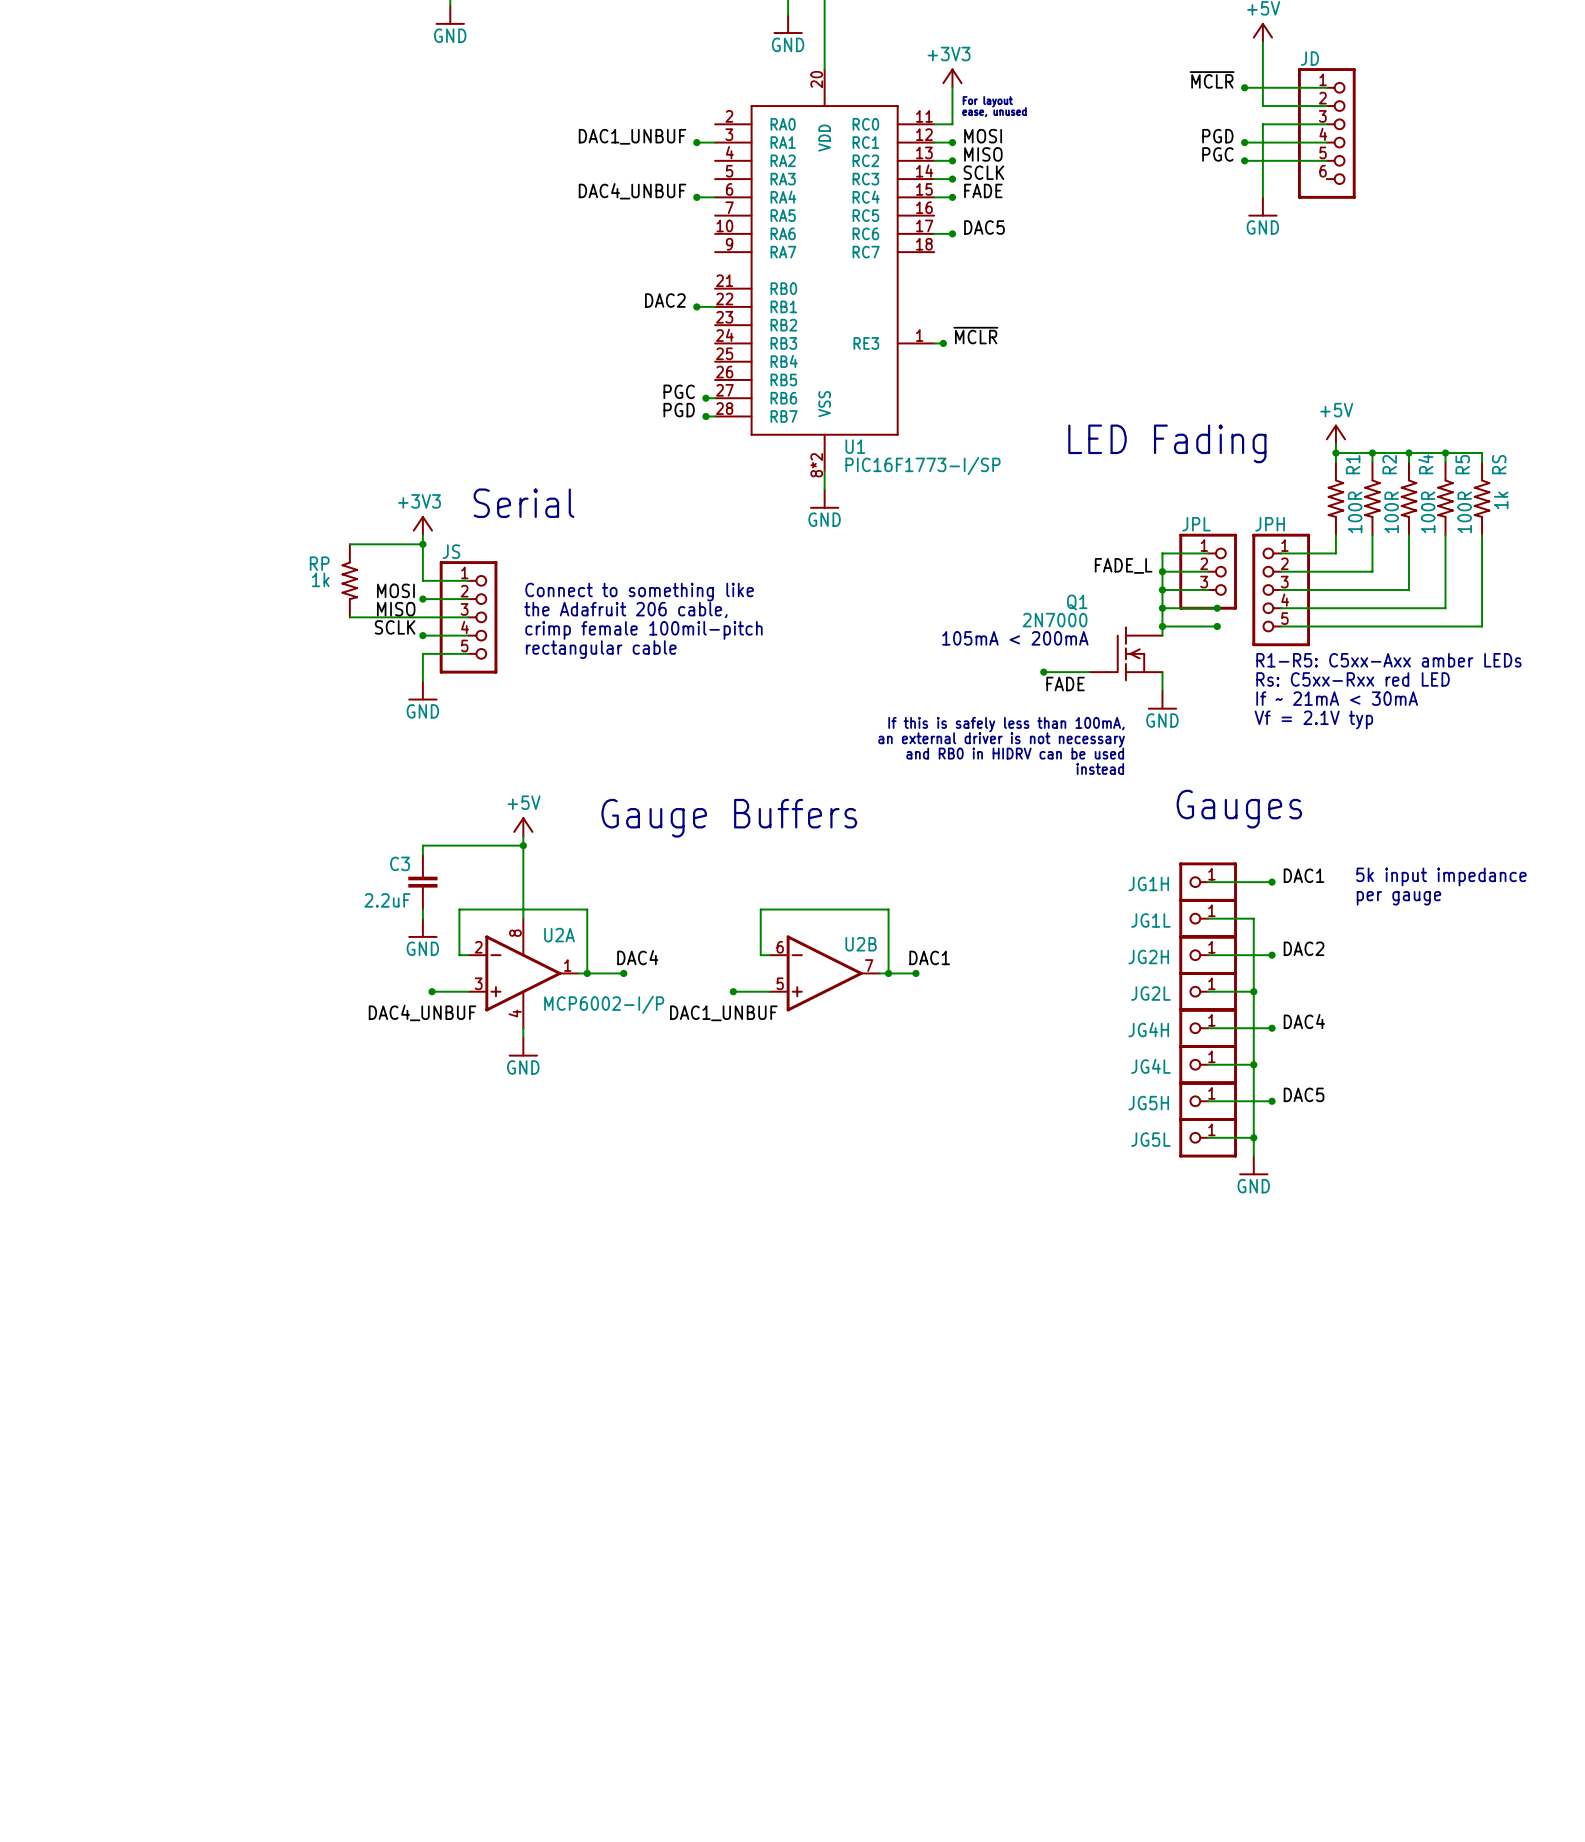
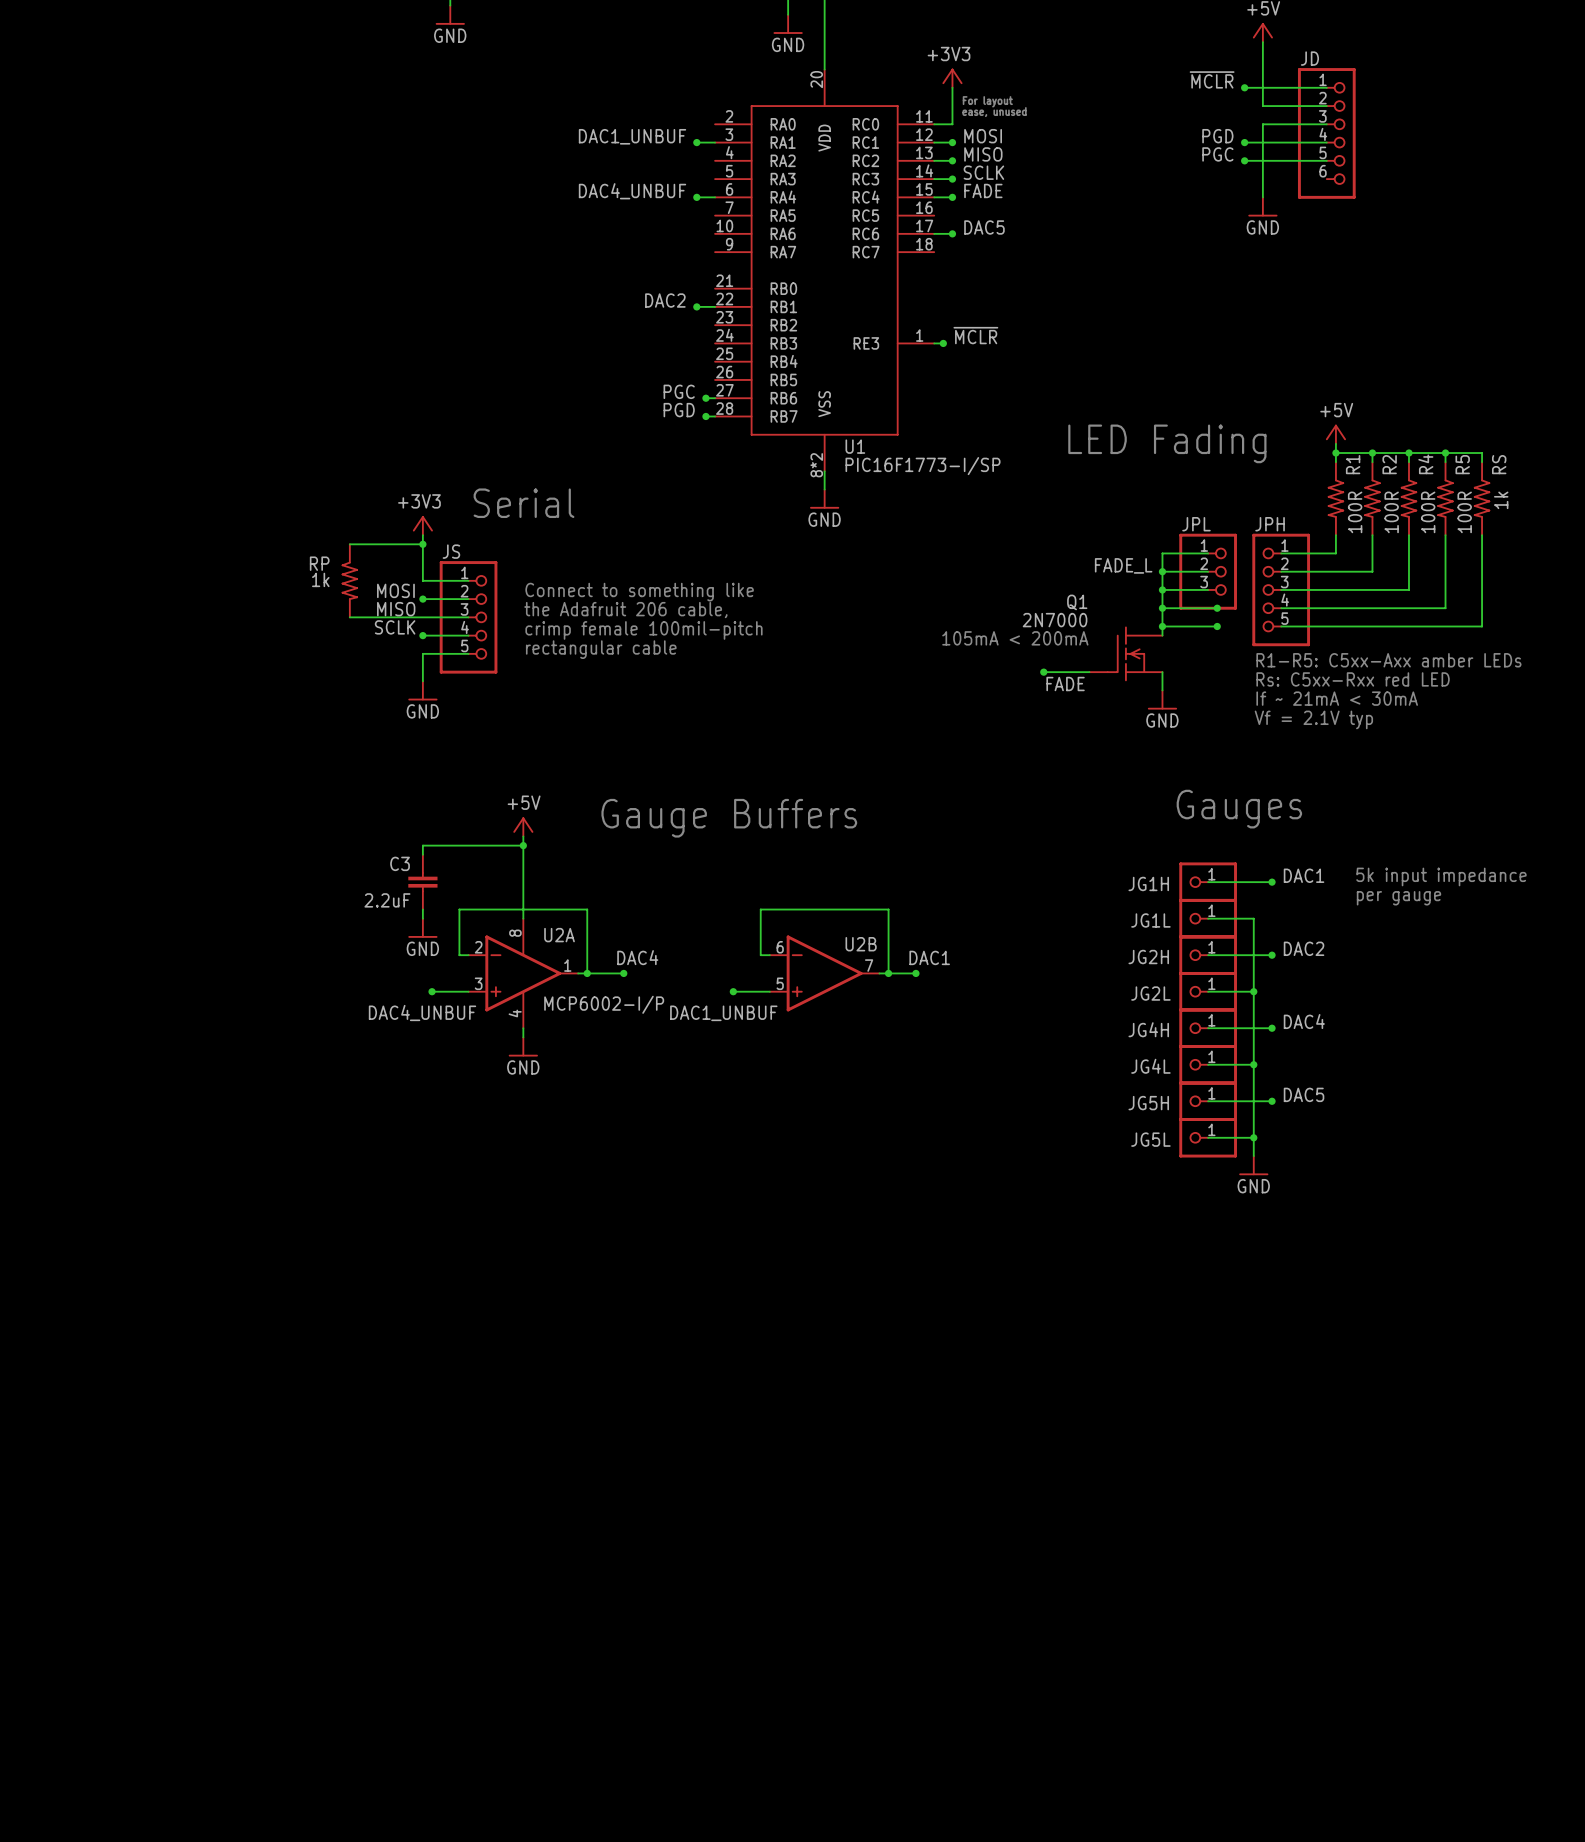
text: If this is safely less than 100mA, (1006, 724) -> none
text: an external driver is not necessary (1001, 739) -> none
text: and RB0 in HIDRV can be used (1015, 753) -> none
text: instead (1100, 768) -> none

